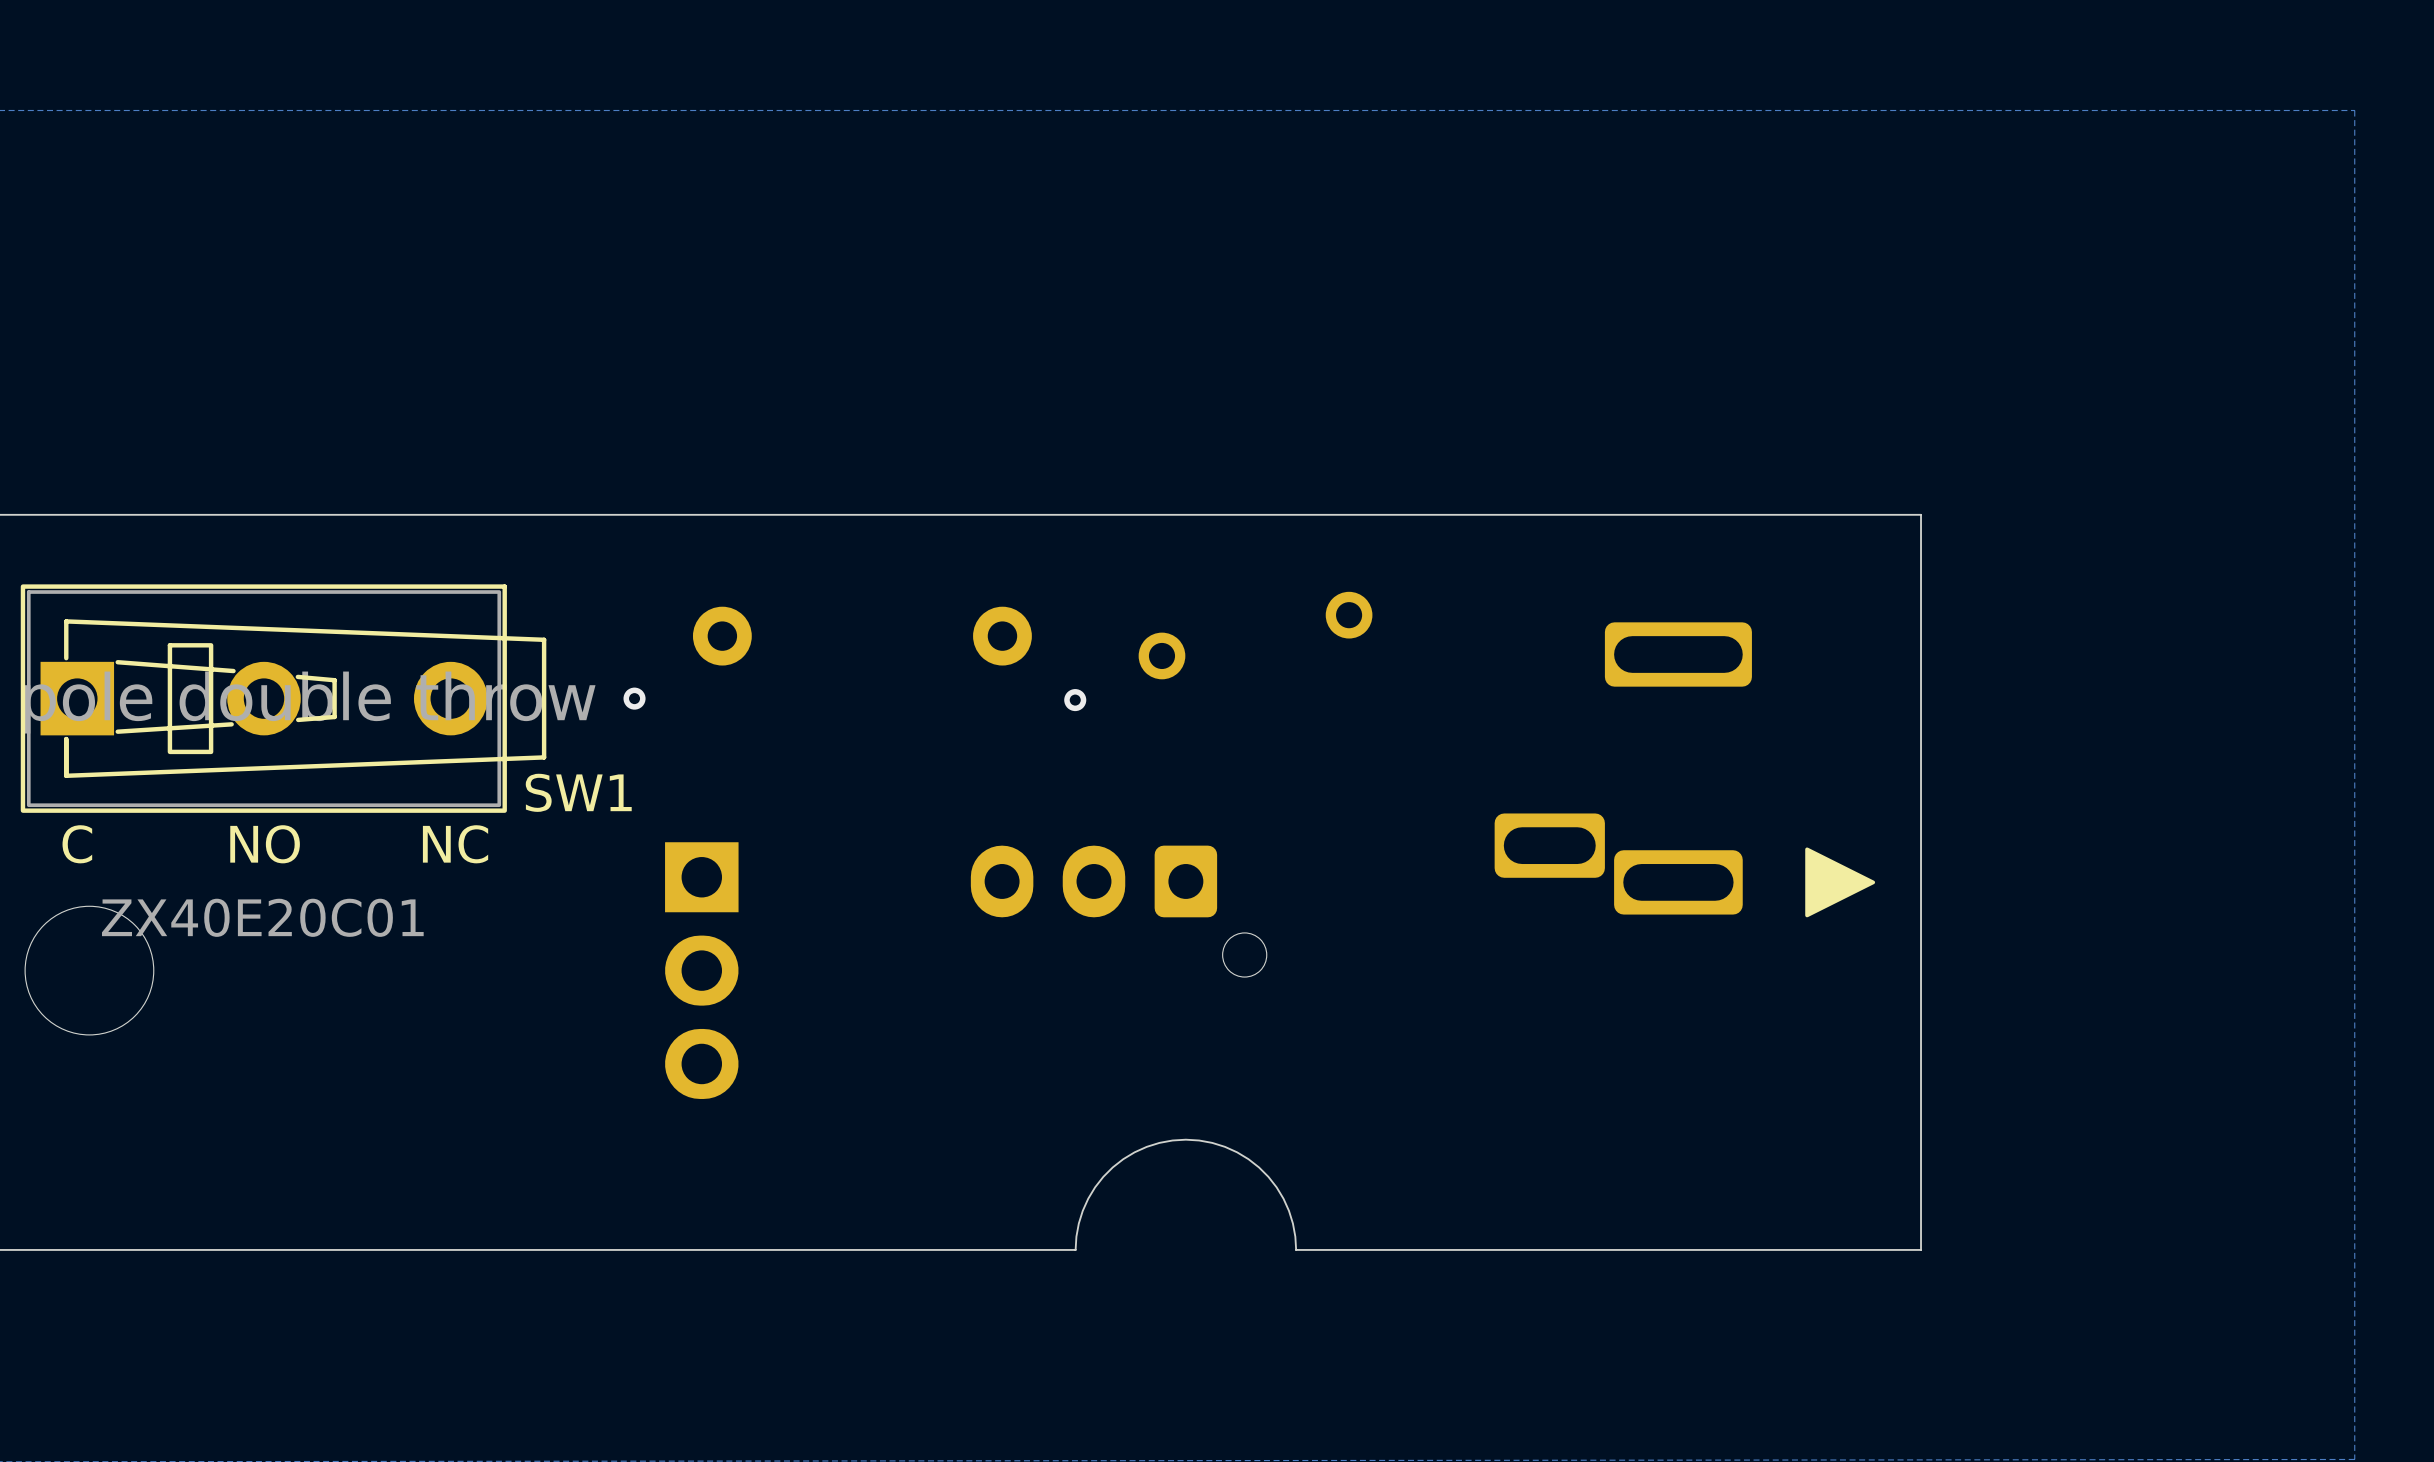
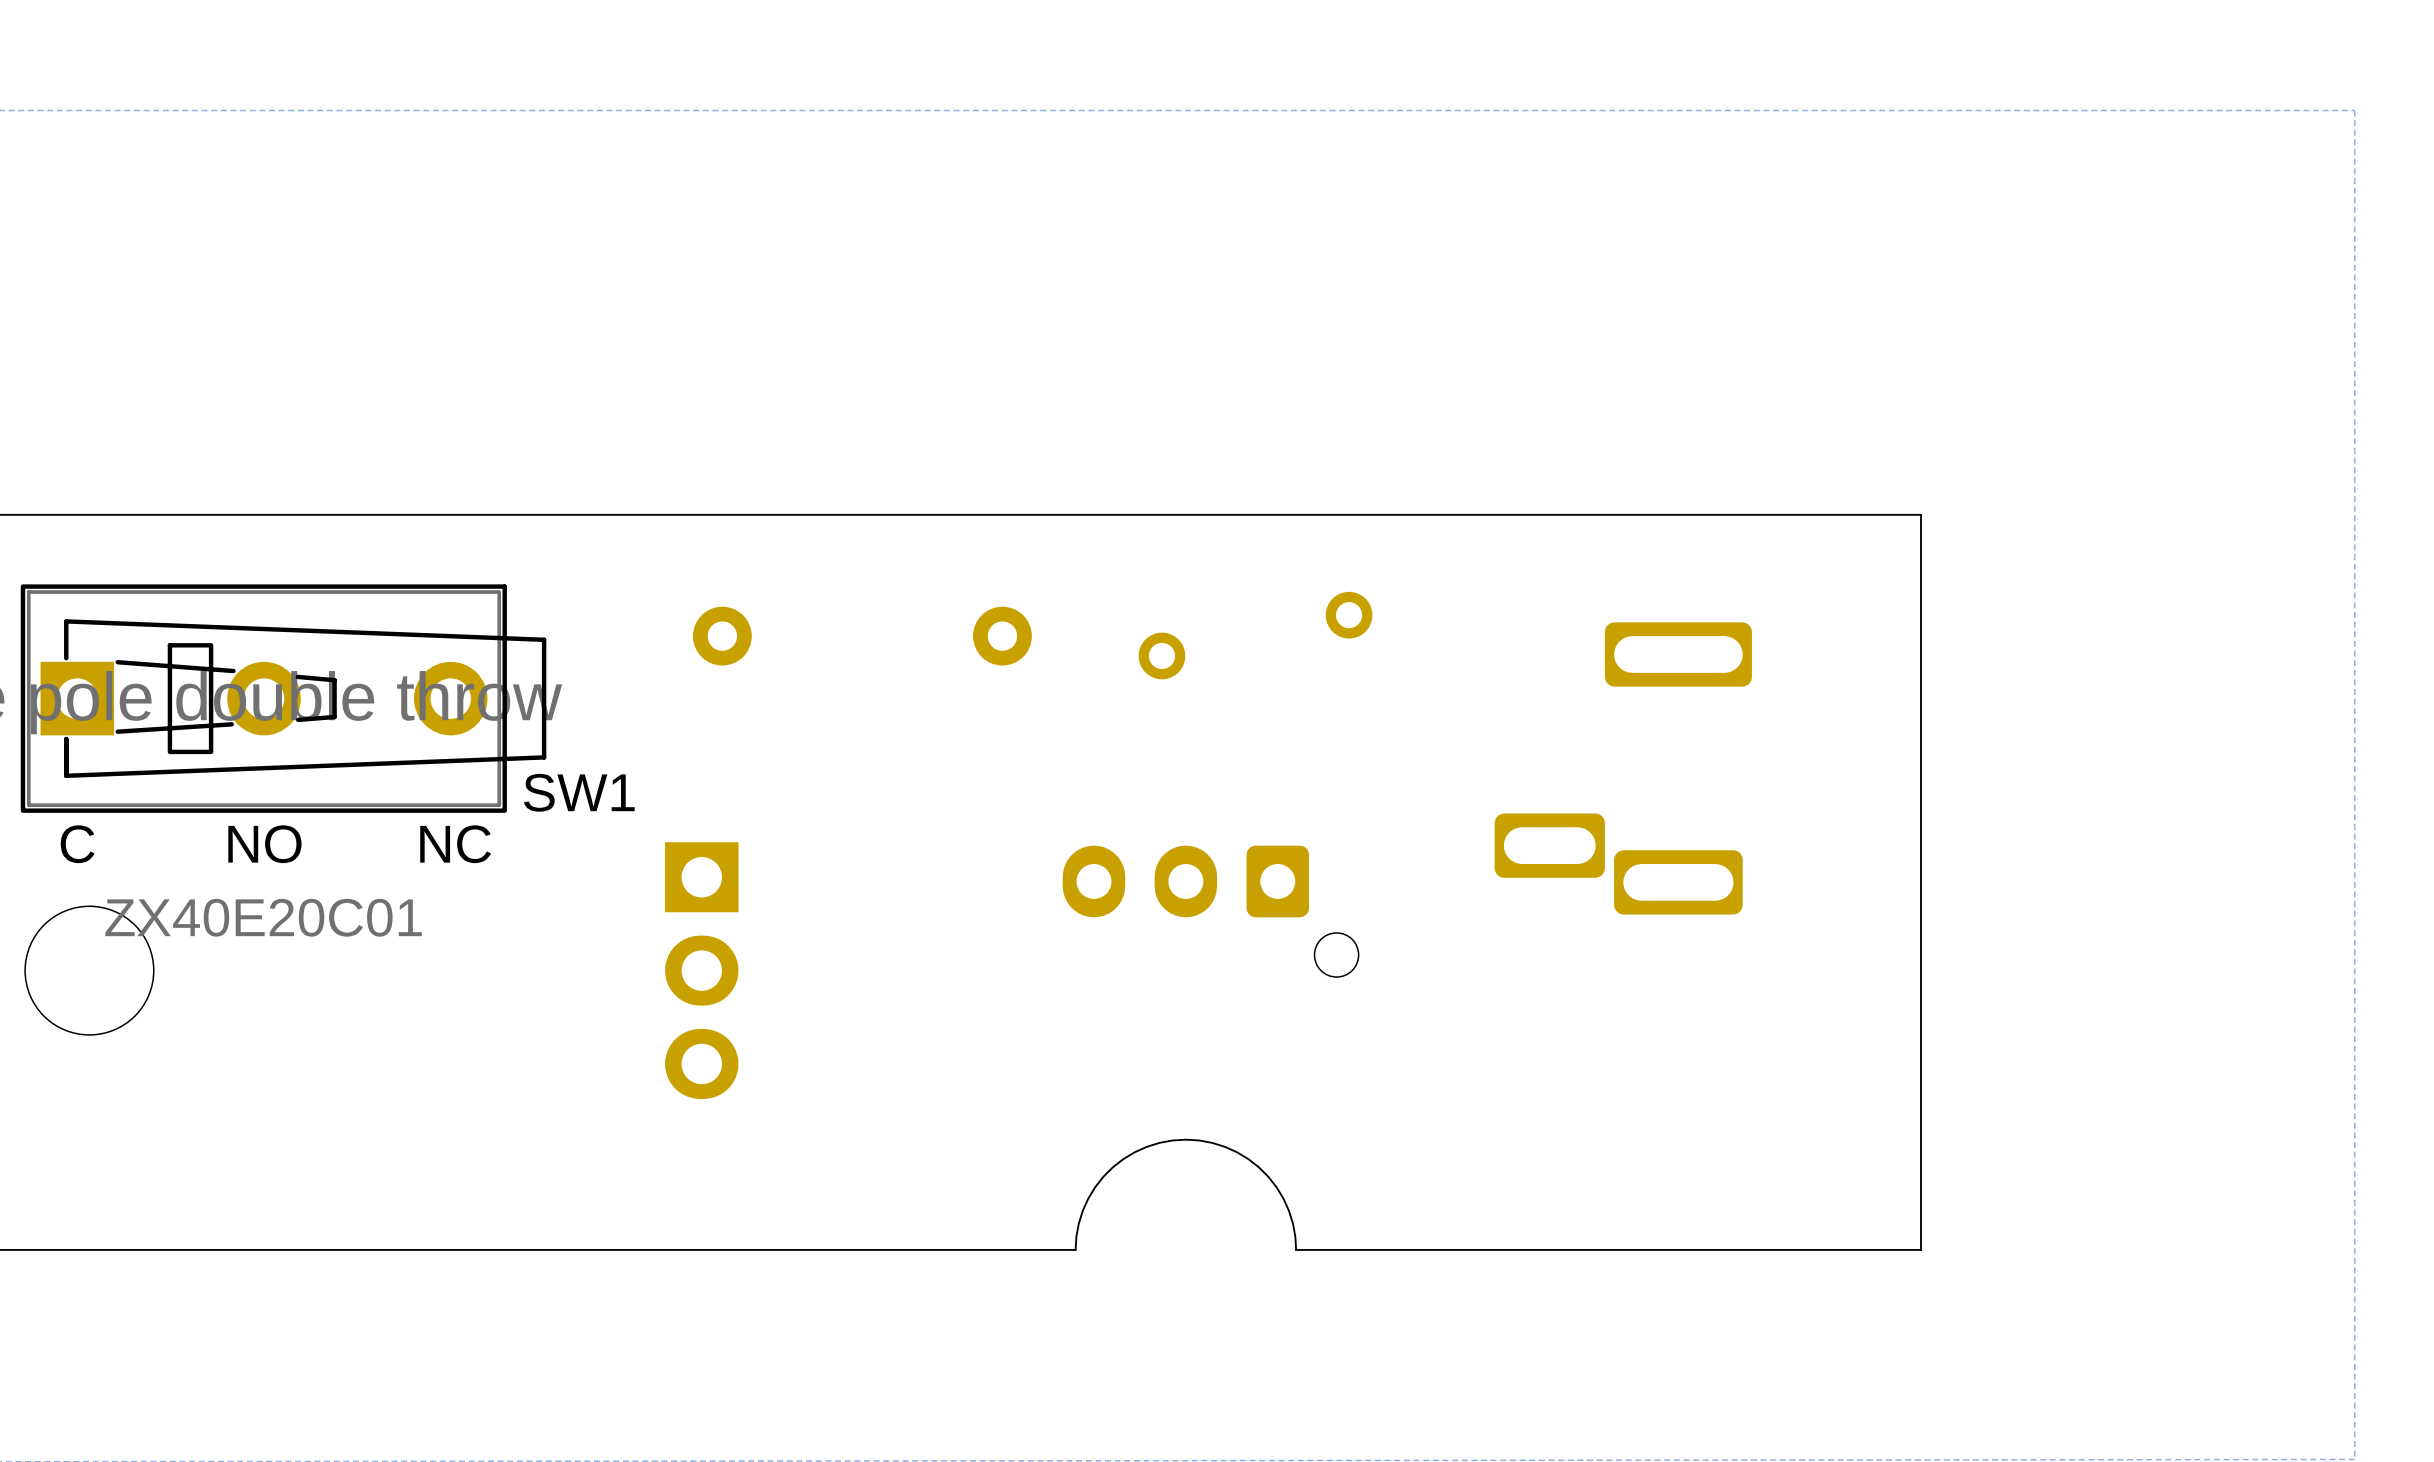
via: (634, 698) -> none
via: (1075, 700) -> none
drawing: [1805, 847, 1876, 918] -> none
part position: (1118, 911) -> (1210, 911)

